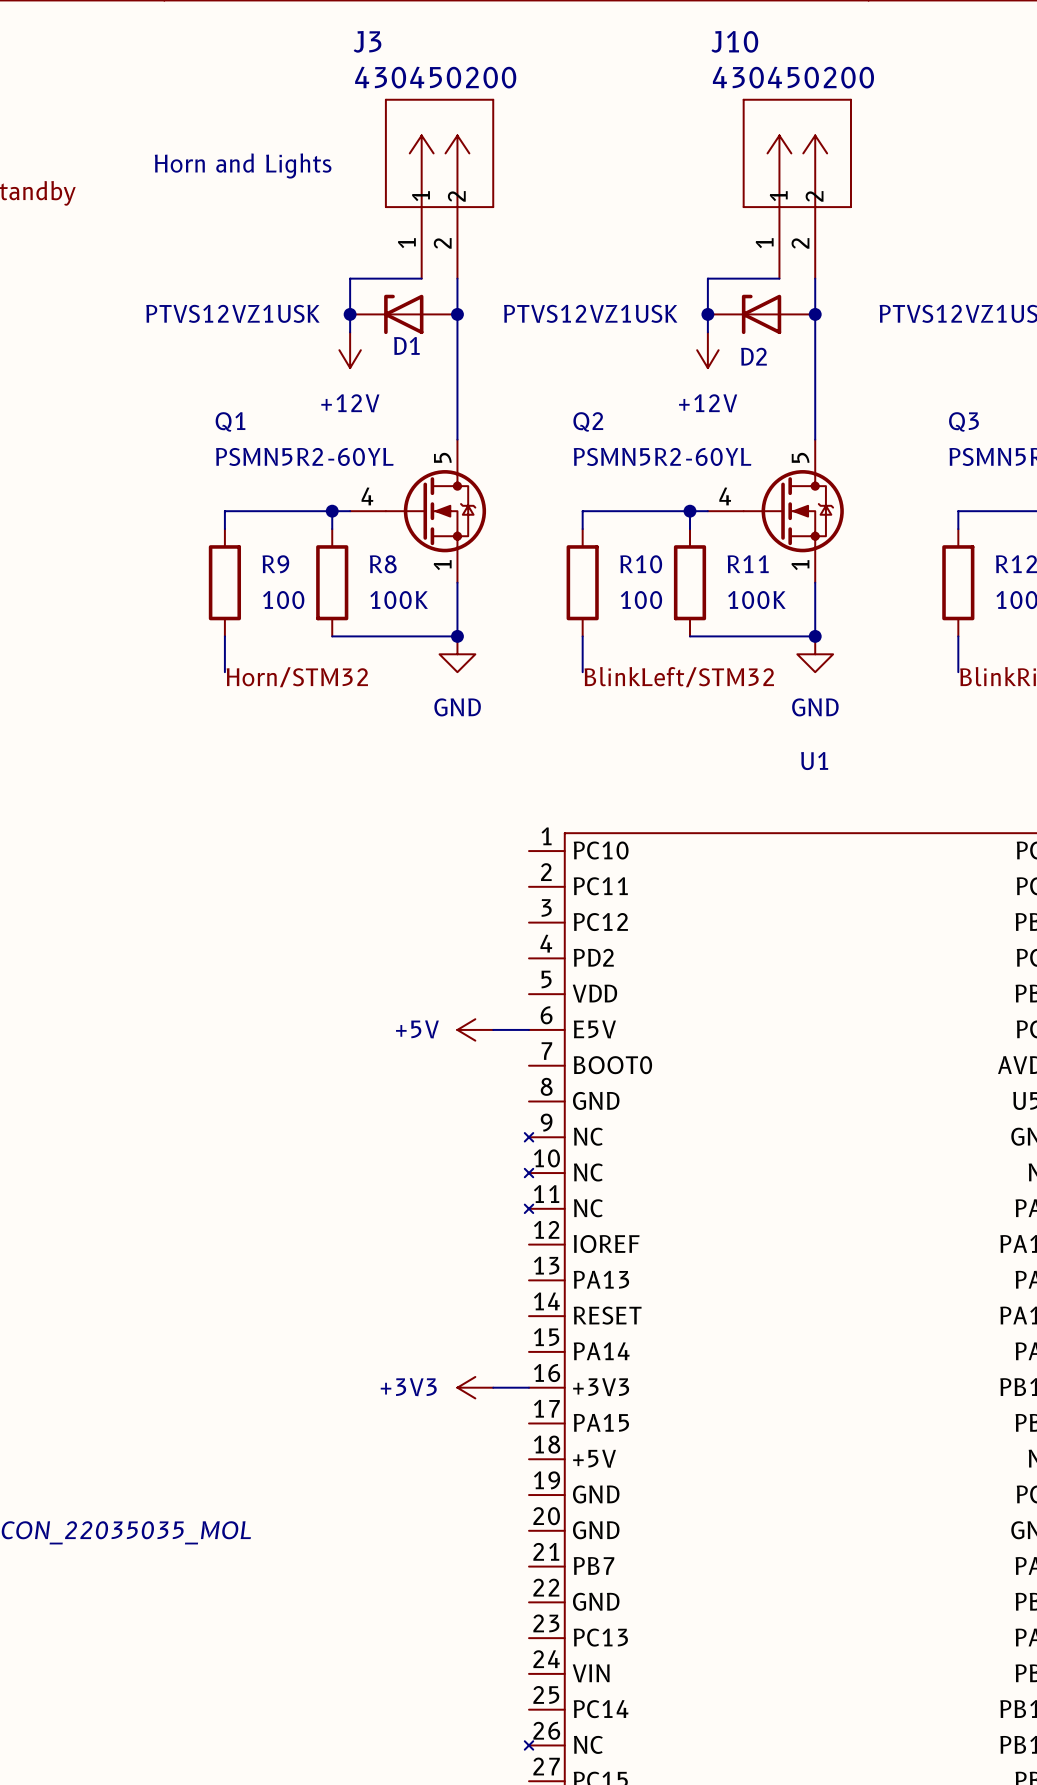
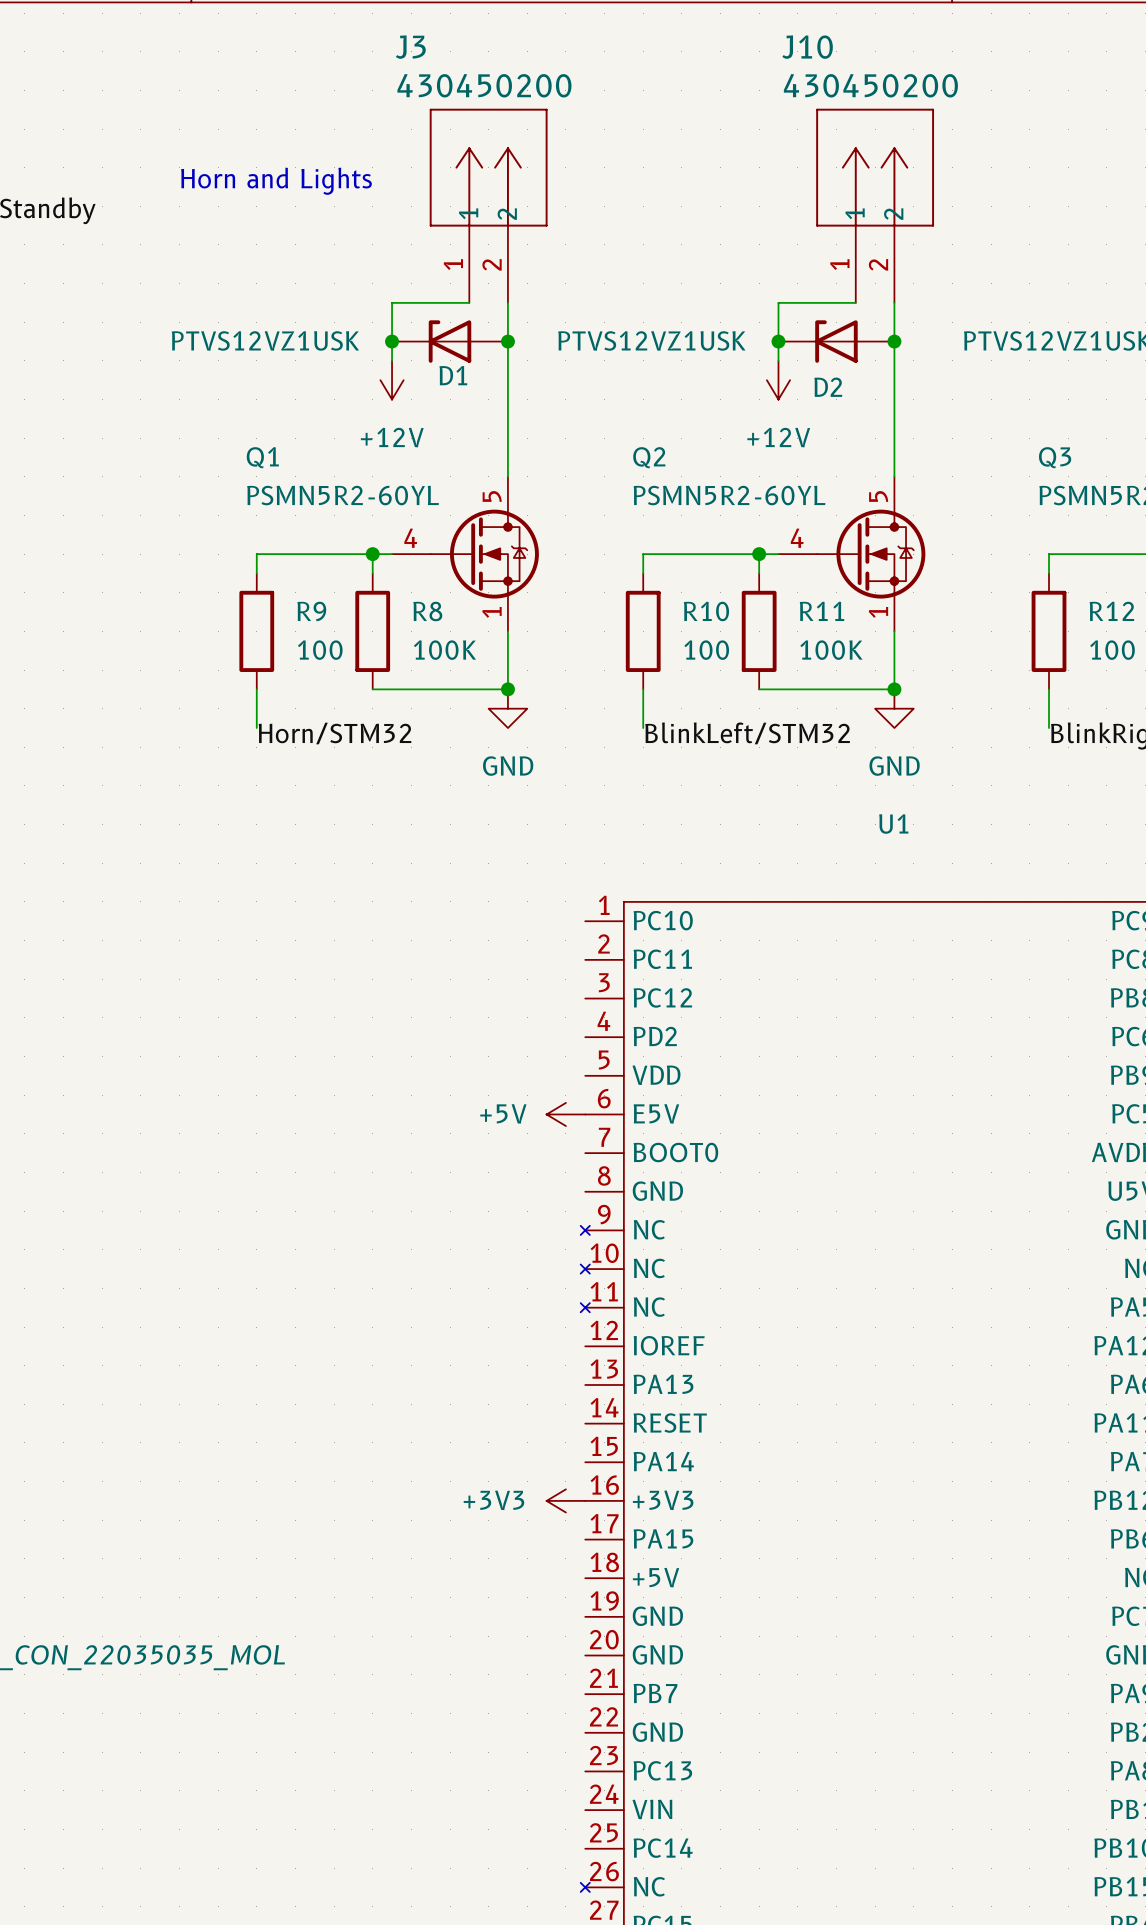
power symbol position: +5V (475, 1029) -> +5V (565, 1114)
power symbol position: +3V3 (475, 1387) -> +3V3 (565, 1500)

